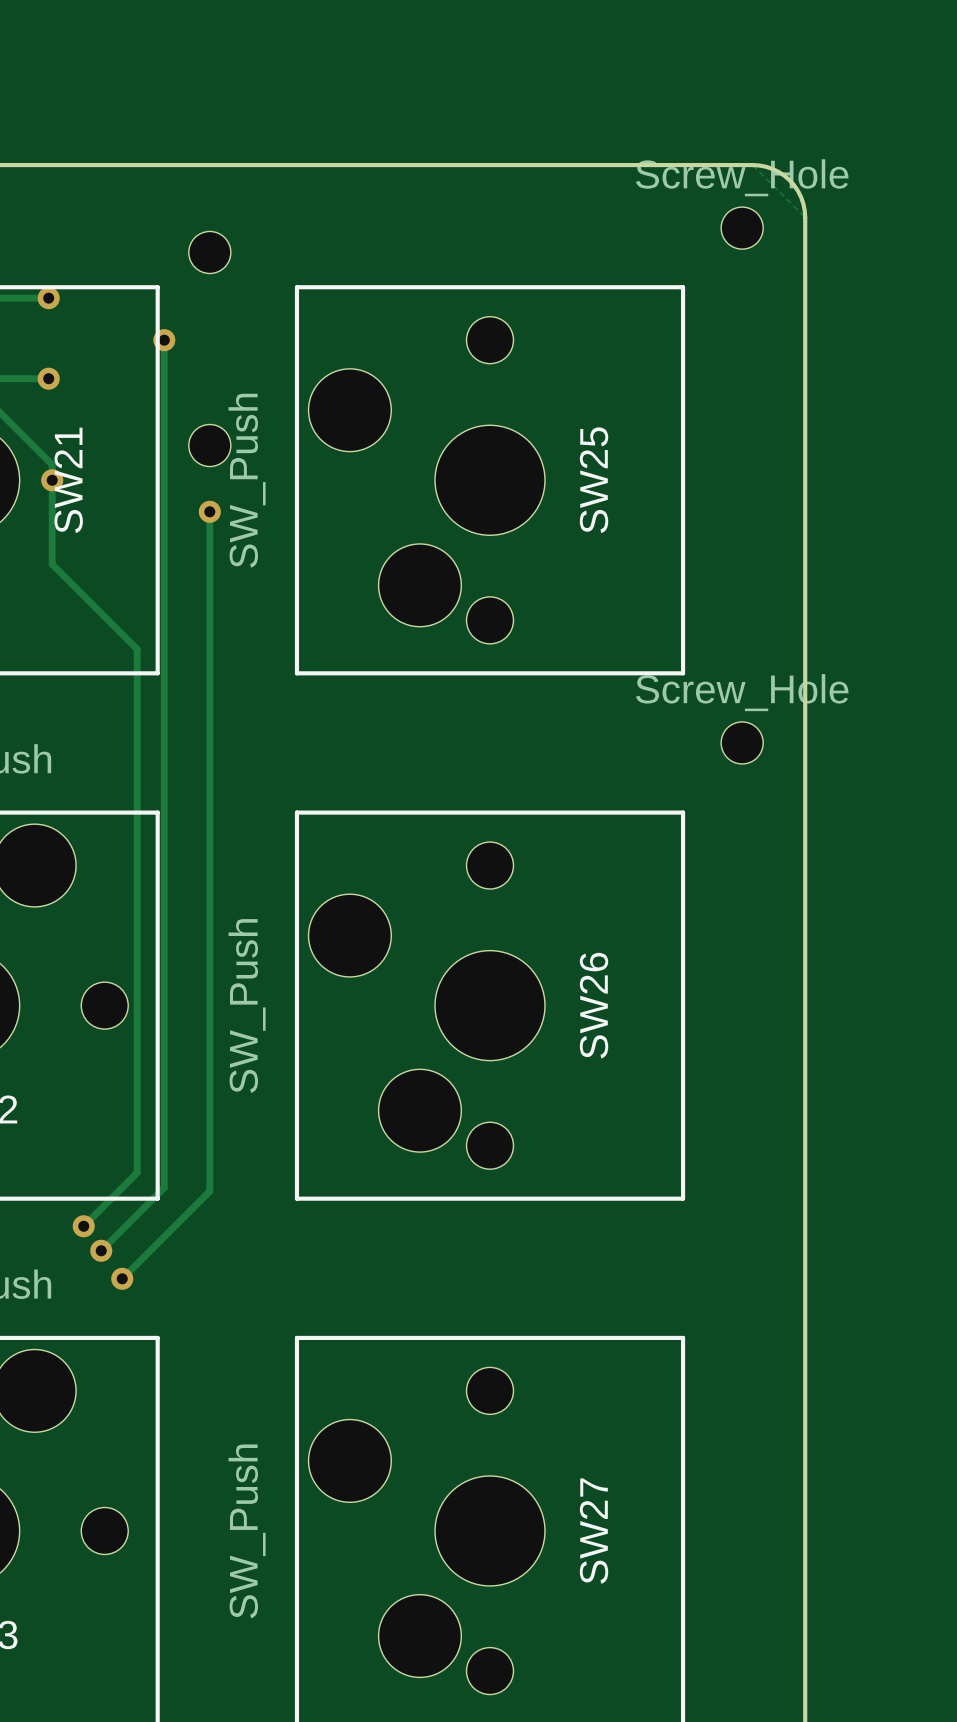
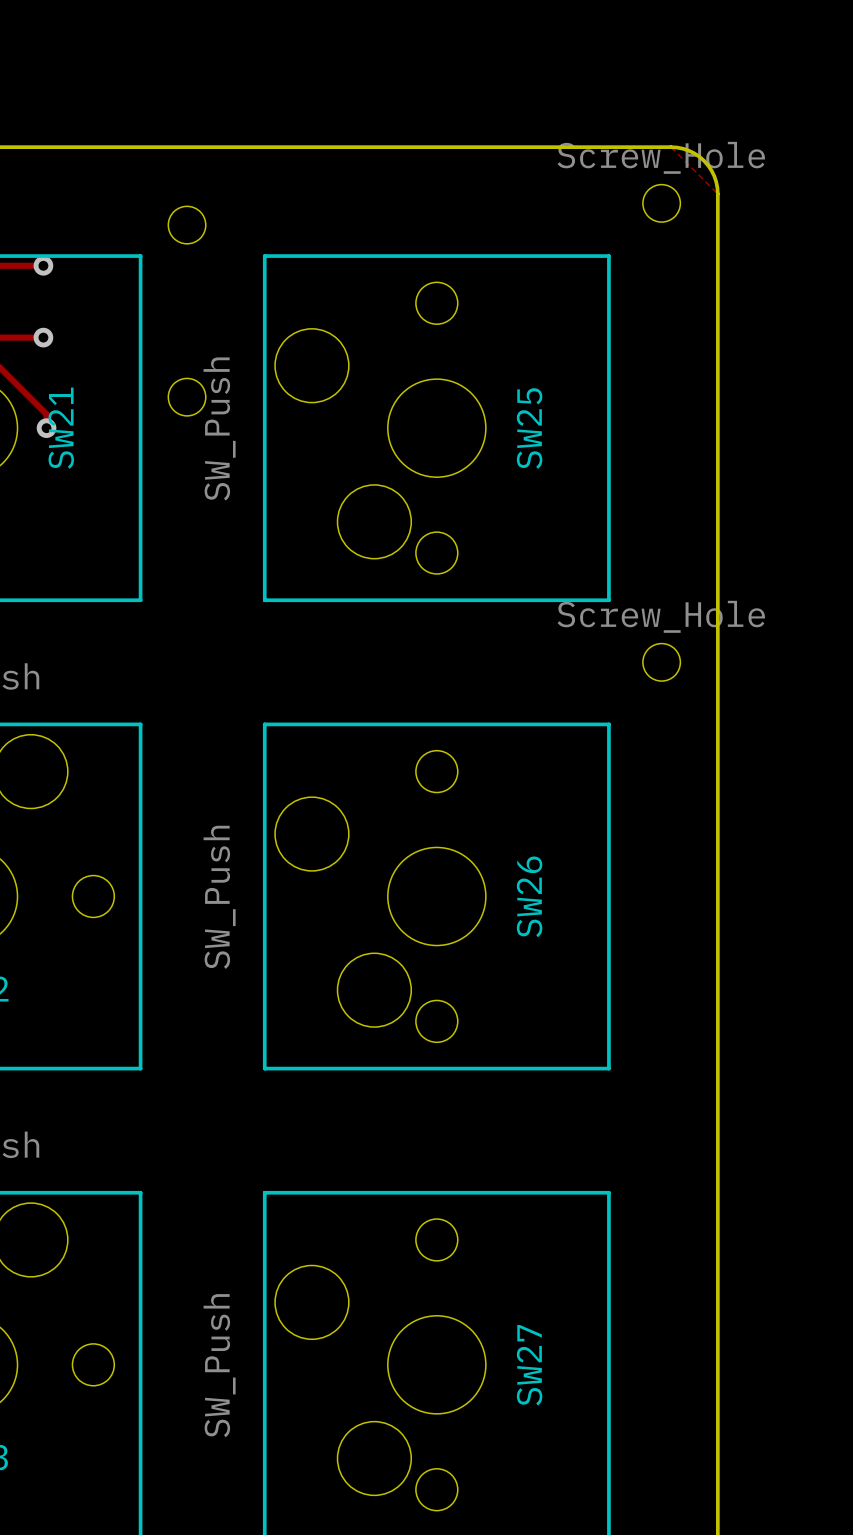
track: (164, 340) (164, 1187) (101, 1250) -> none
via: (164, 340) -> none
track: (52, 480) (52, 564) (137, 649) (137, 1172) (83, 1226) -> none
track: (209, 511) (209, 1191) (122, 1278) -> none
via: (209, 511) -> none
via: (83, 1226) -> none
via: (101, 1250) -> none
via: (122, 1278) -> none

